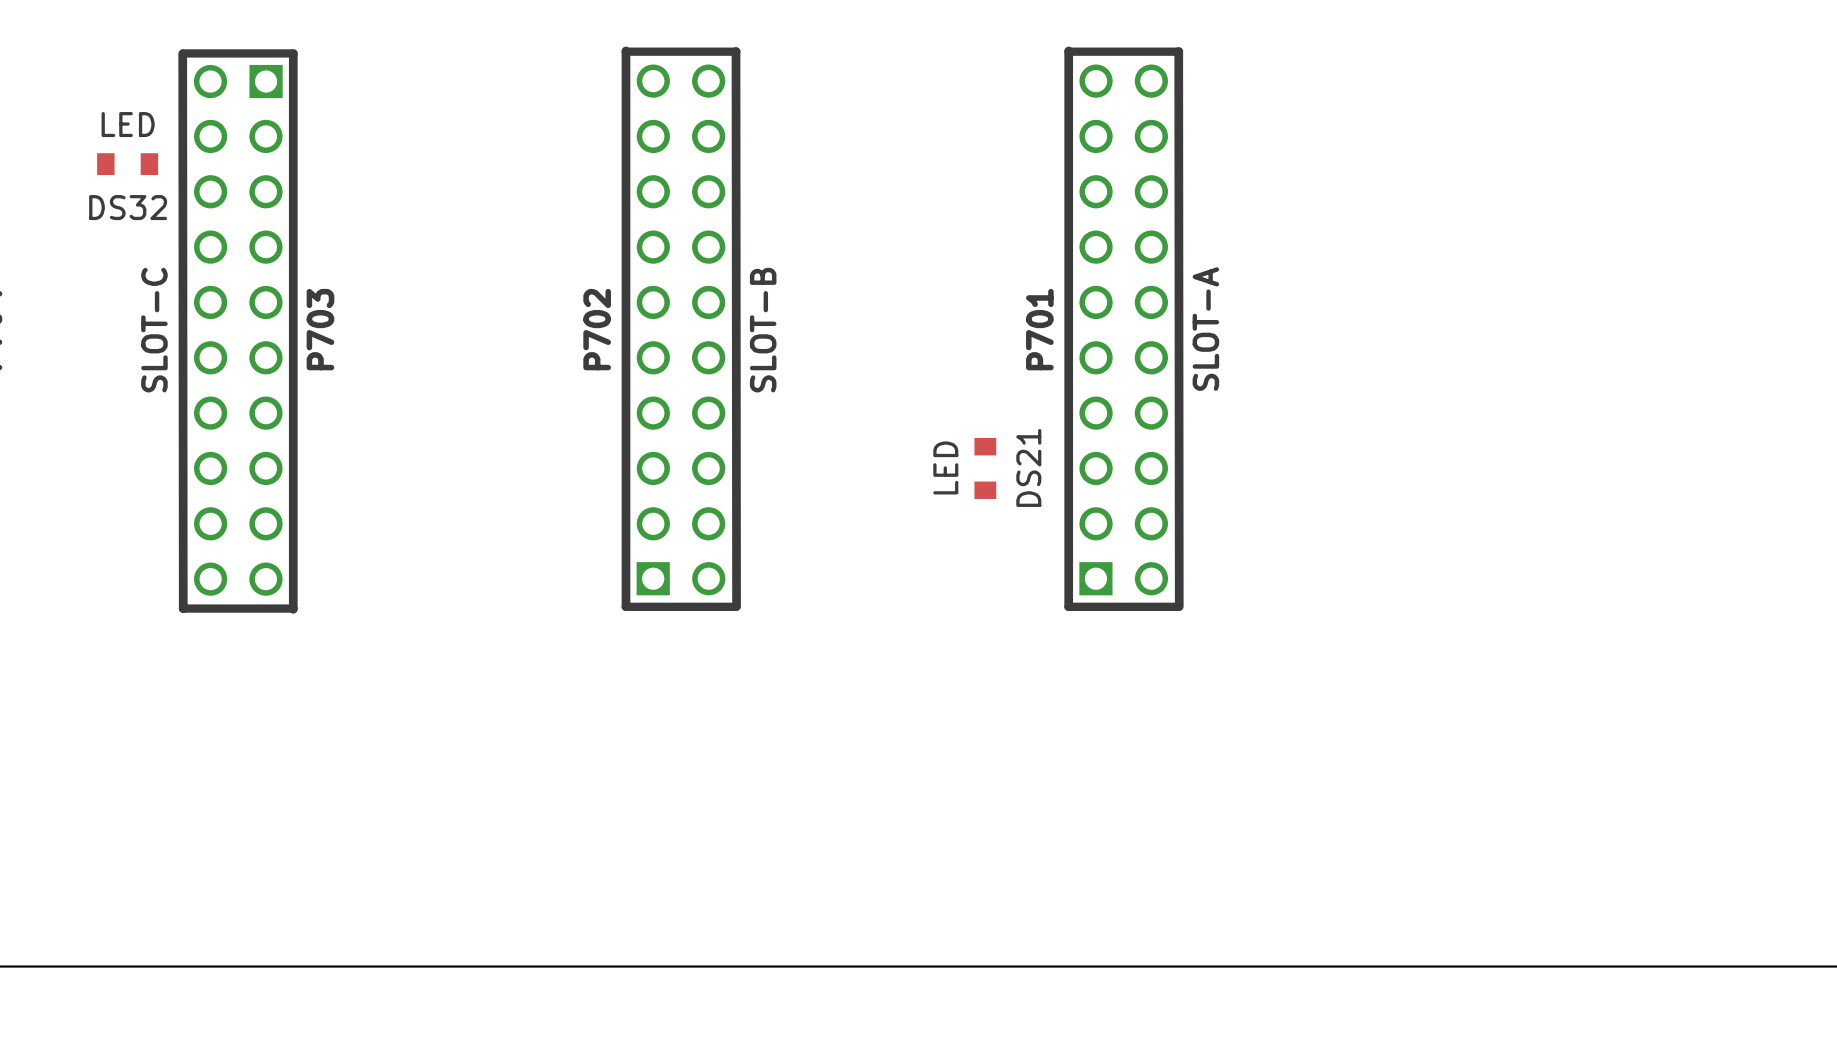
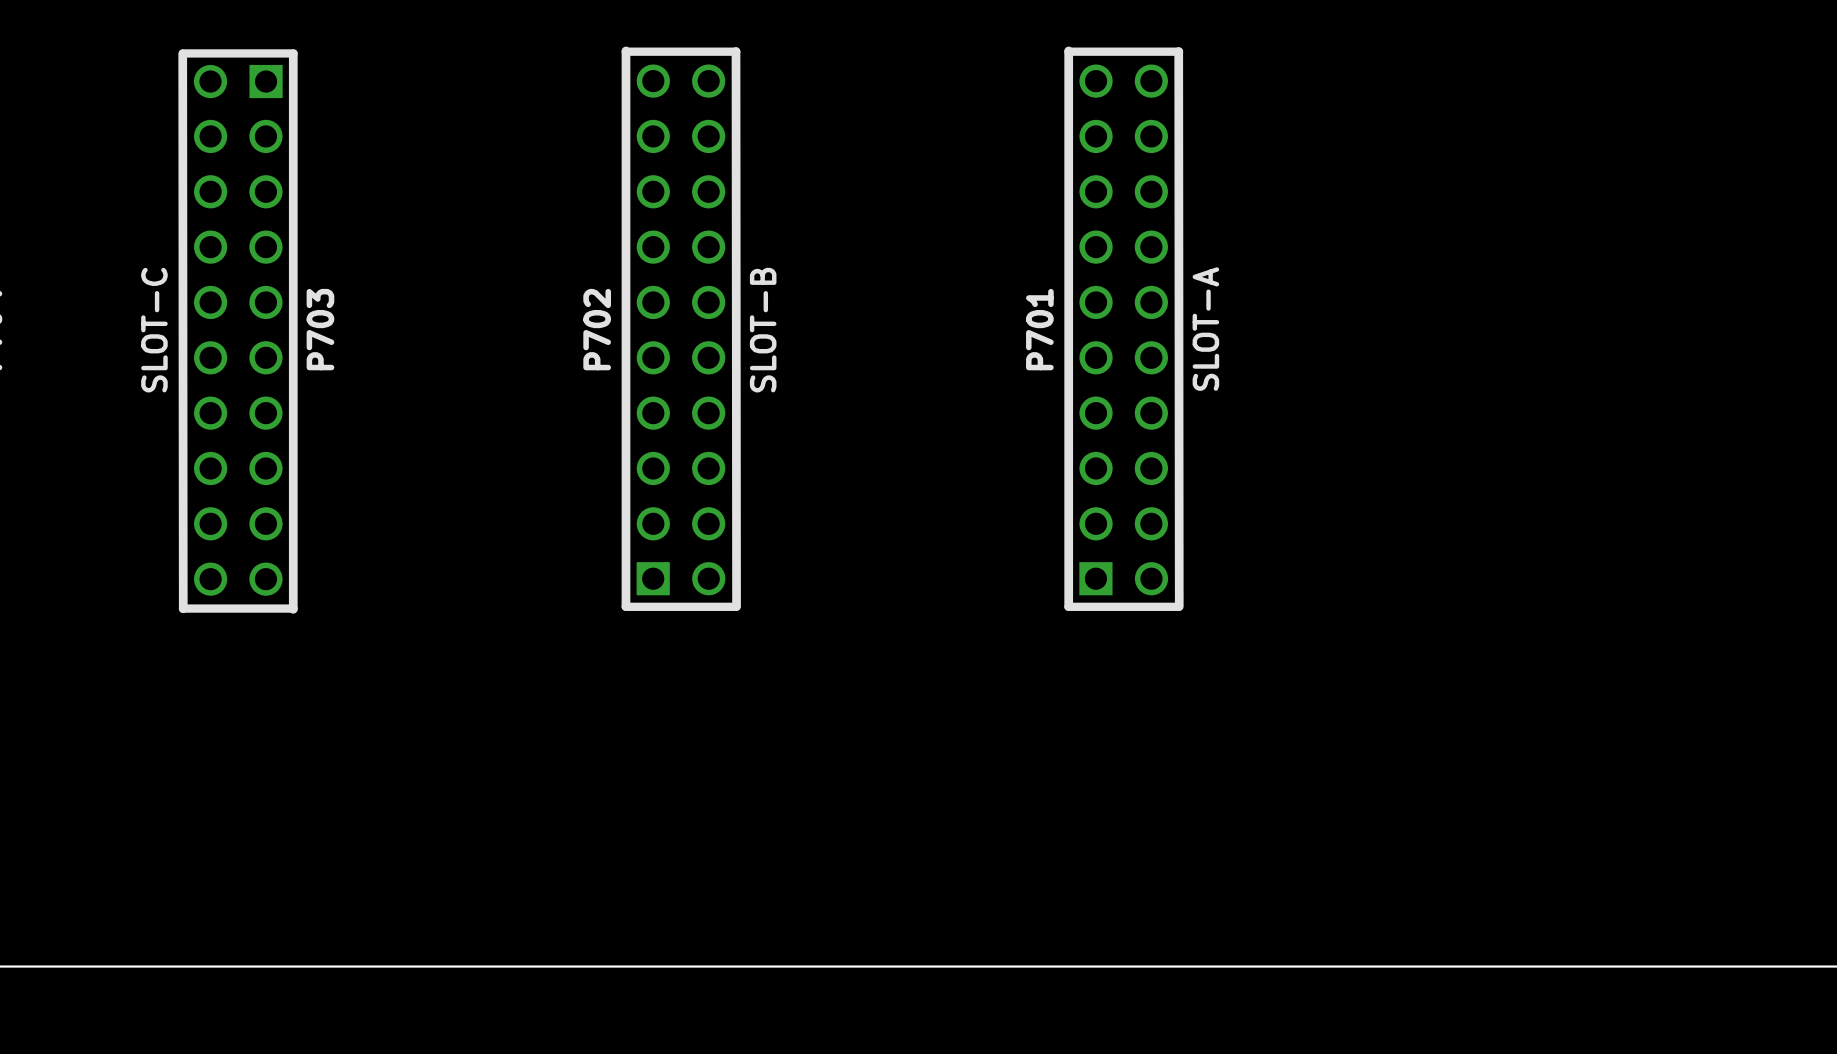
DS32: LED (127, 164) -> none
DS21: LED (985, 468) -> none

